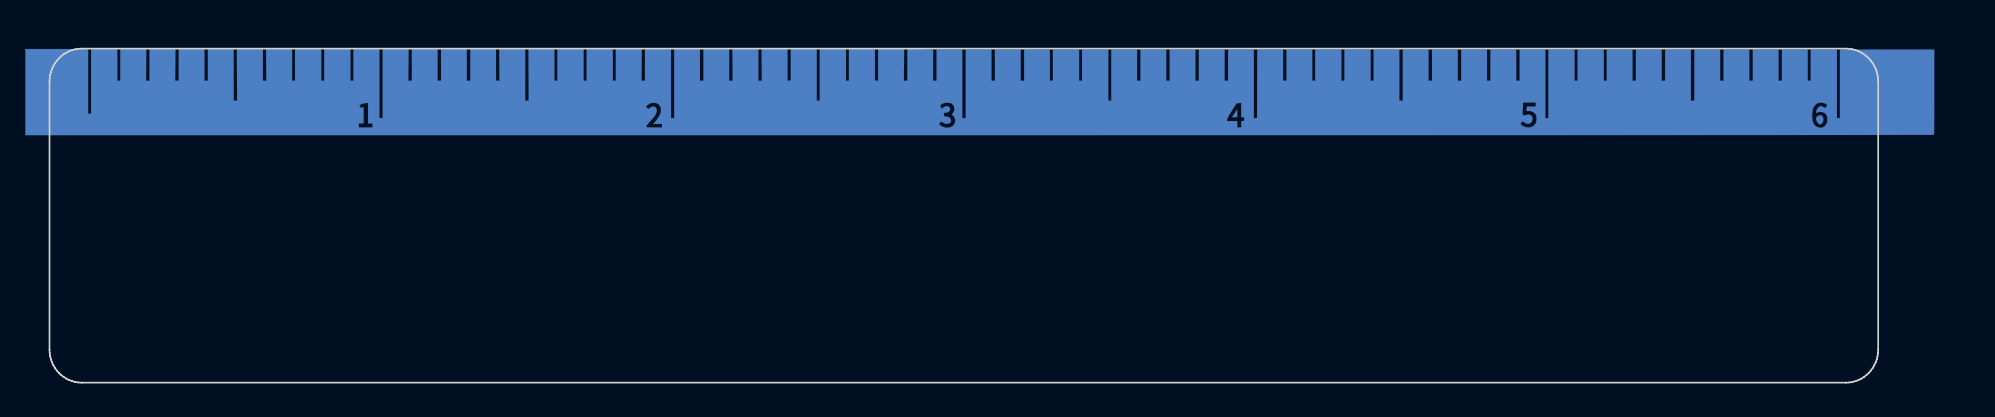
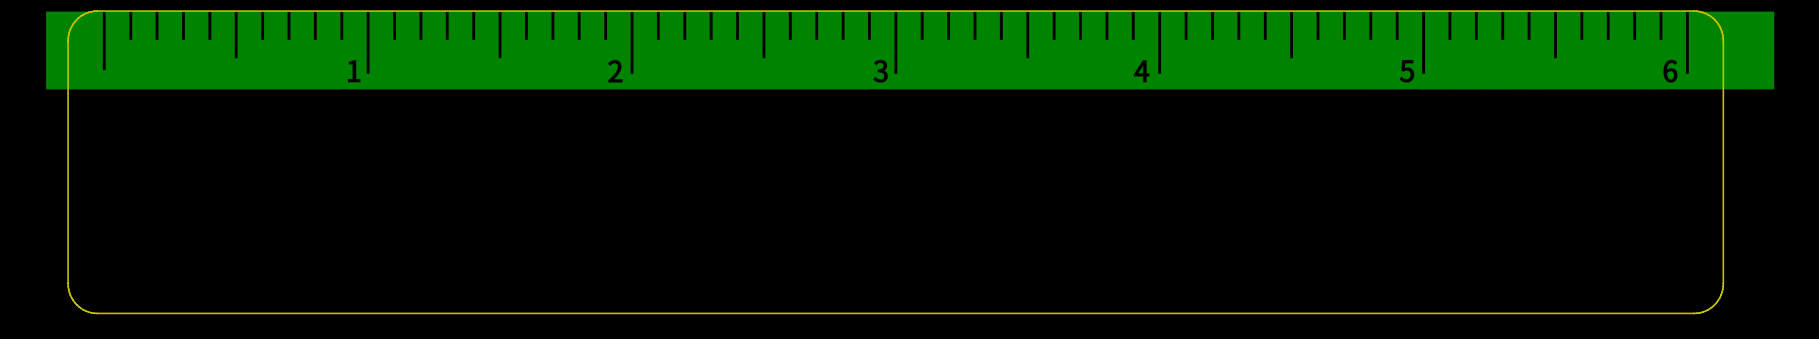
drawing shape: [25, 48, 1935, 136] -> [46, 11, 1775, 90]

